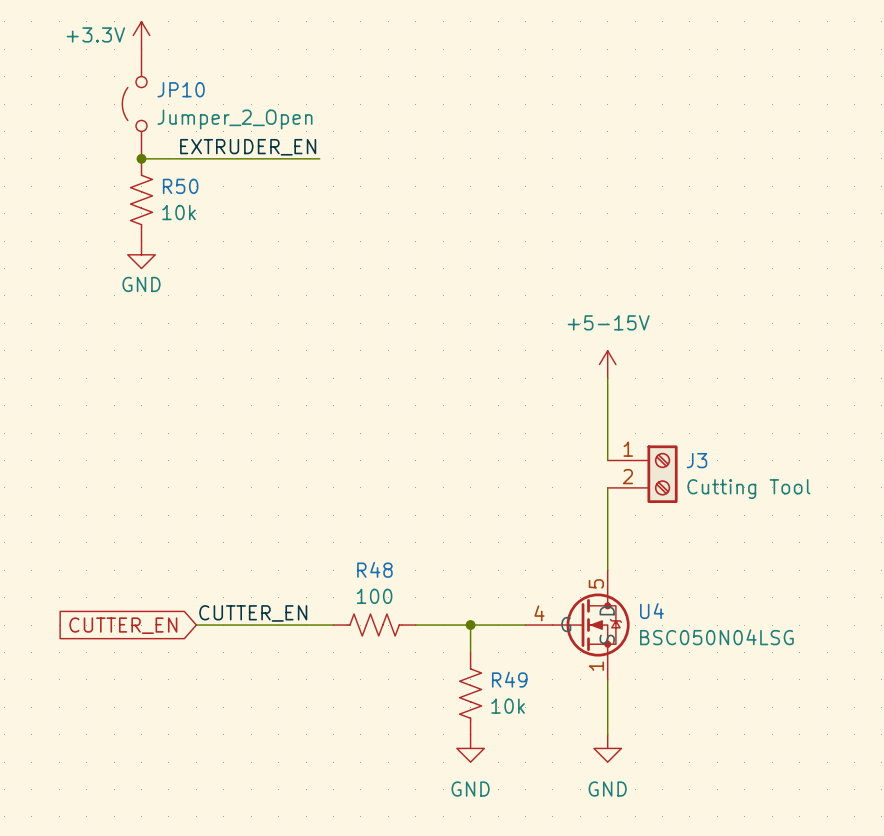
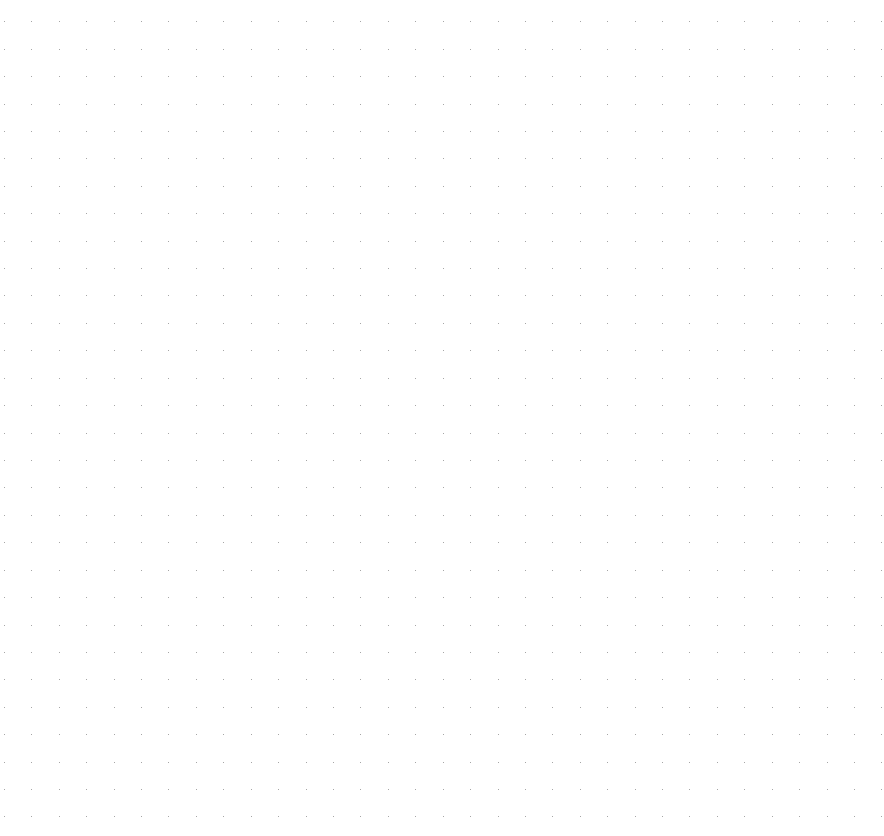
power symbol: +3.3V (141, 35) -> none
JP10: Jumper_2_Open (134, 104) -> none
label: EXTRUDER_EN (248, 147) -> none
wire: (141, 158) (319, 158) -> none
junction: (141, 158) -> none
R50: 10k (141, 199) -> none
power symbol: GND (141, 254) -> none
power symbol: +5-15V (607, 364) -> none
wire: (607, 378) (607, 460) -> none
J3: Cutting Tool (642, 474) -> none
wire: (607, 487) (607, 570) -> none
label: CUTTER_EN (253, 613) -> none
global label: CUTTER_EN (123, 625) -> none
wire: (196, 625) (333, 625) -> none
R48: 100 (374, 625) -> none
wire: (415, 625) (525, 625) -> none
wire: (470, 625) (470, 652) -> none
junction: (470, 625) -> none
U4: BSC050N04LSG (577, 625) -> none
wire: (607, 679) (607, 734) -> none
R49: 10k (470, 693) -> none
power symbol: GND (470, 748) -> none
power symbol: GND (607, 748) -> none

